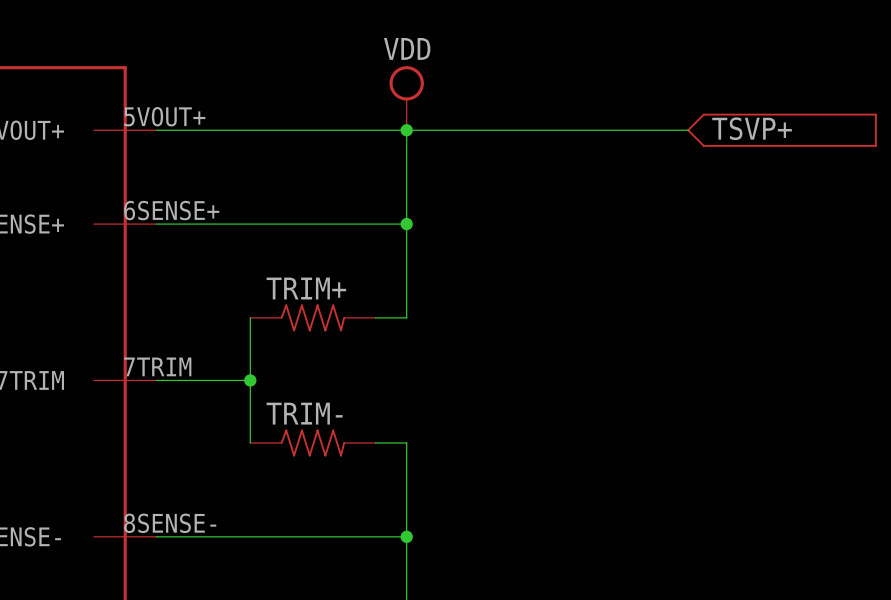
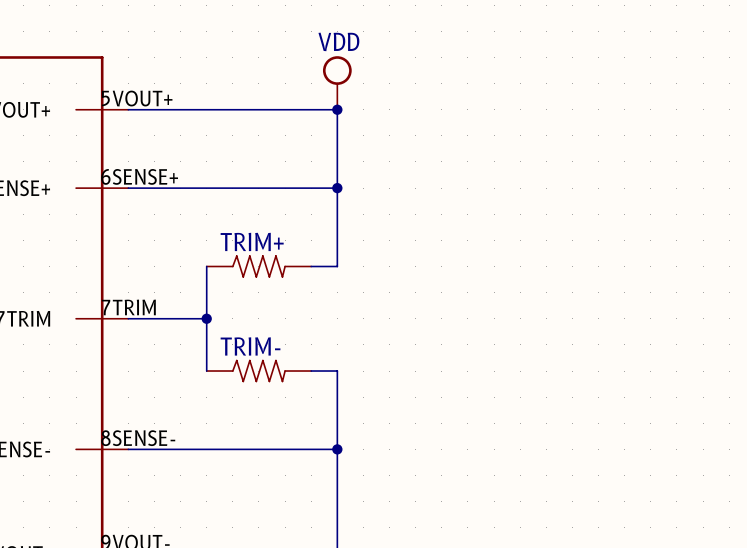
wire: (406, 130) (688, 130) -> none
part: TSVP+ (782, 130) -> none

